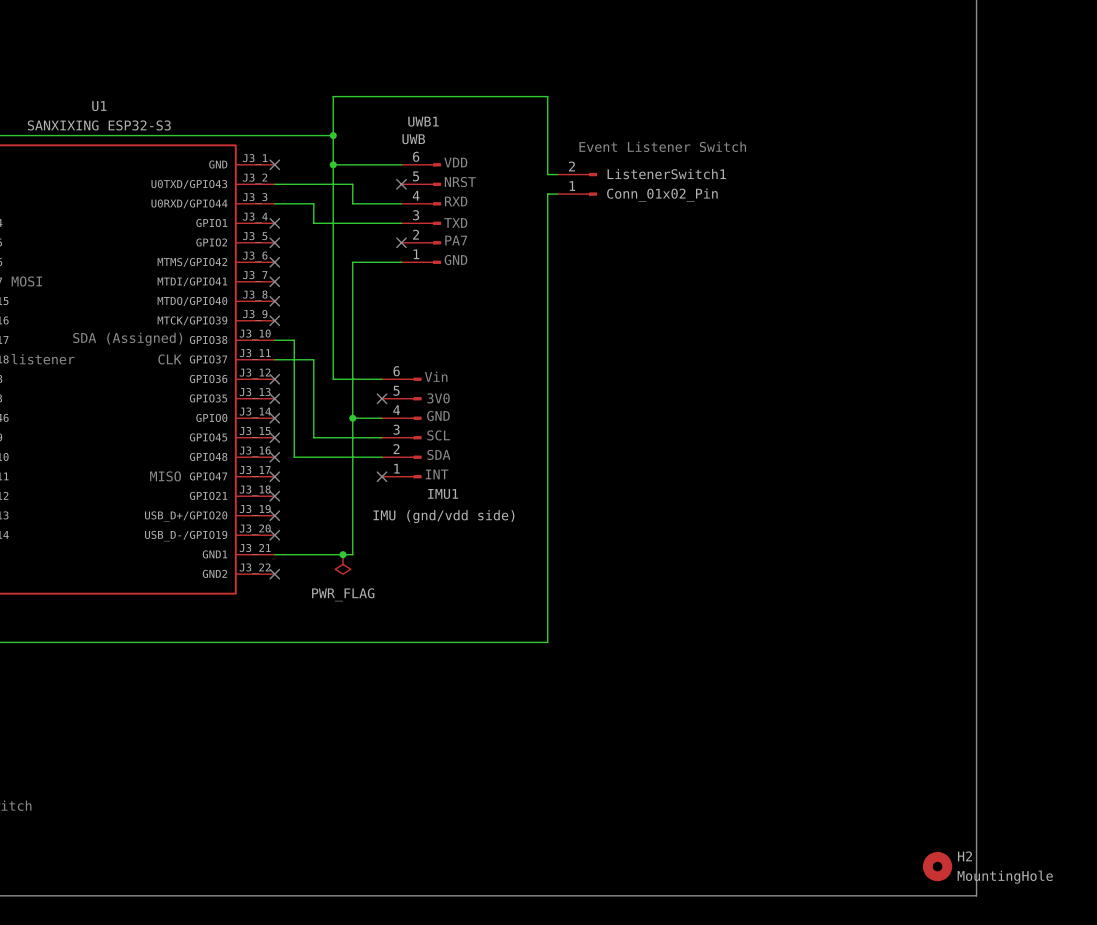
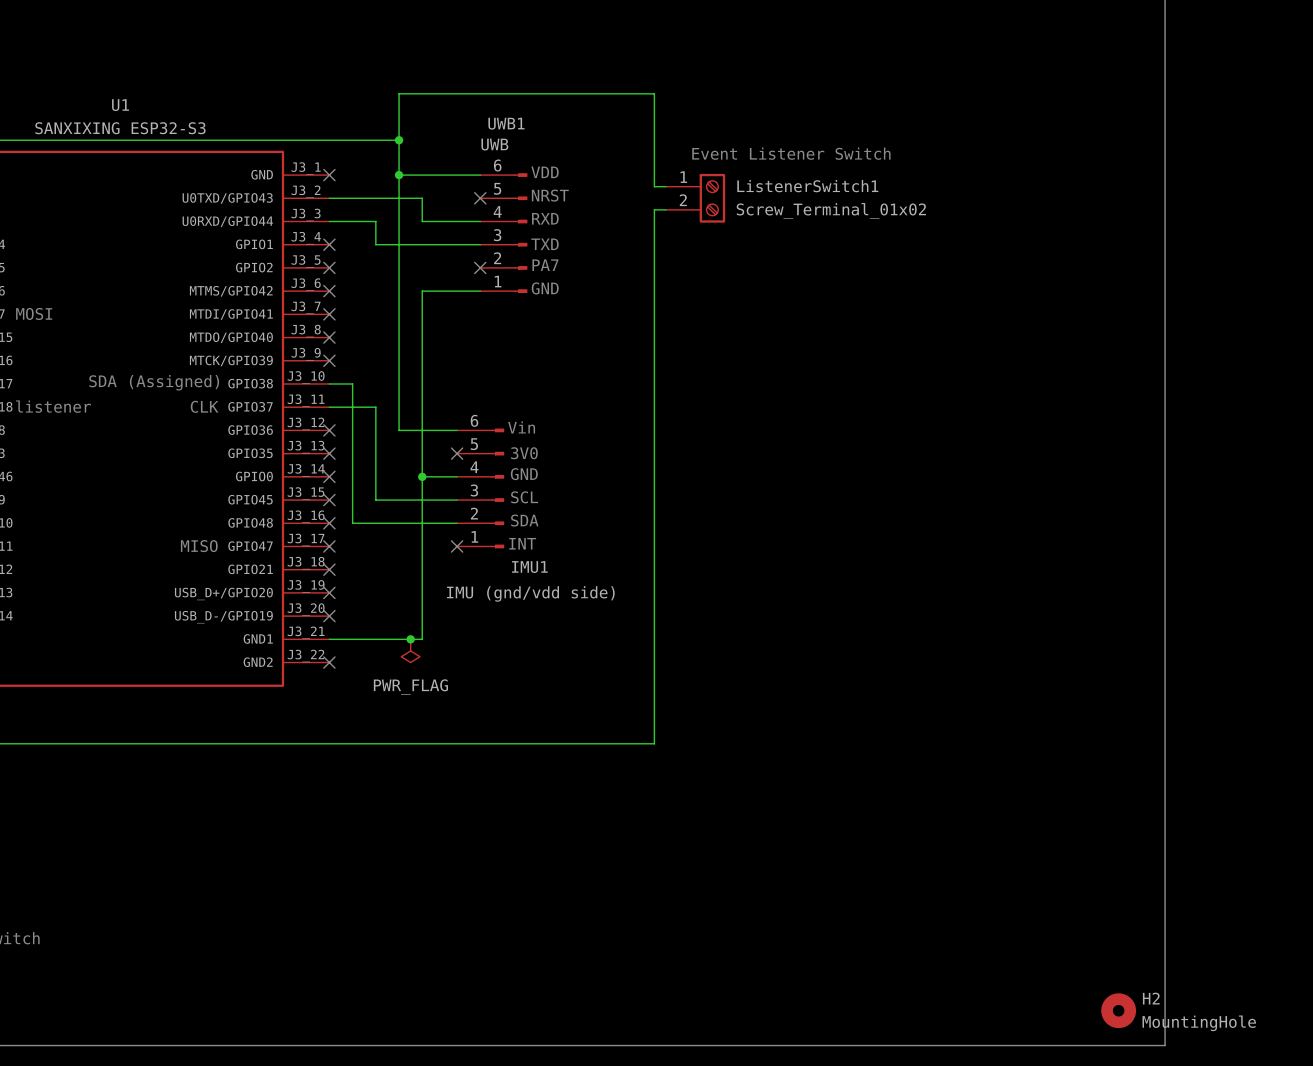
ListenerSwitch1 symbol: [557, 173, 598, 196] -> [666, 173, 726, 223]
ListenerSwitch1 value: Conn_01x02_Pin (662, 195) -> Screw_Terminal_01x02 (831, 211)

